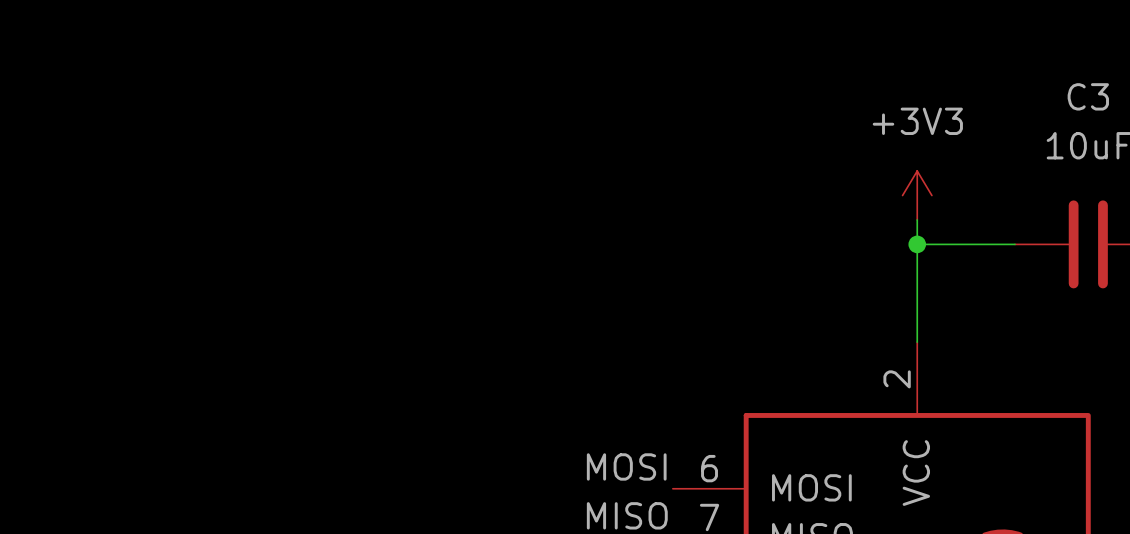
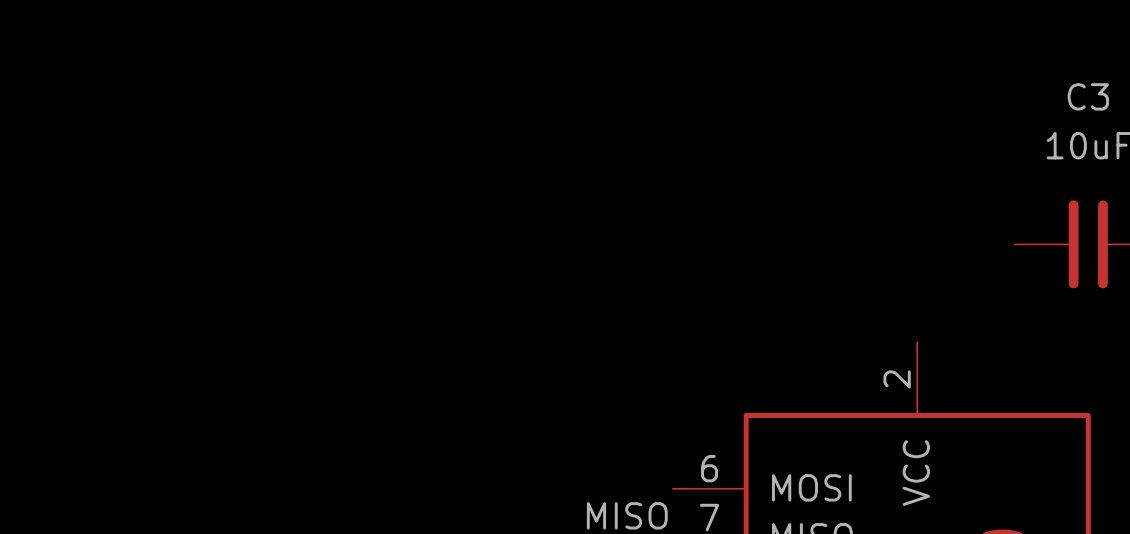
power symbol: +3V3 (917, 195) -> none
wire: (917, 219) (917, 342) -> none
wire: (917, 244) (1014, 244) -> none
junction: (917, 244) -> none
label: MOSI (626, 466) -> none

